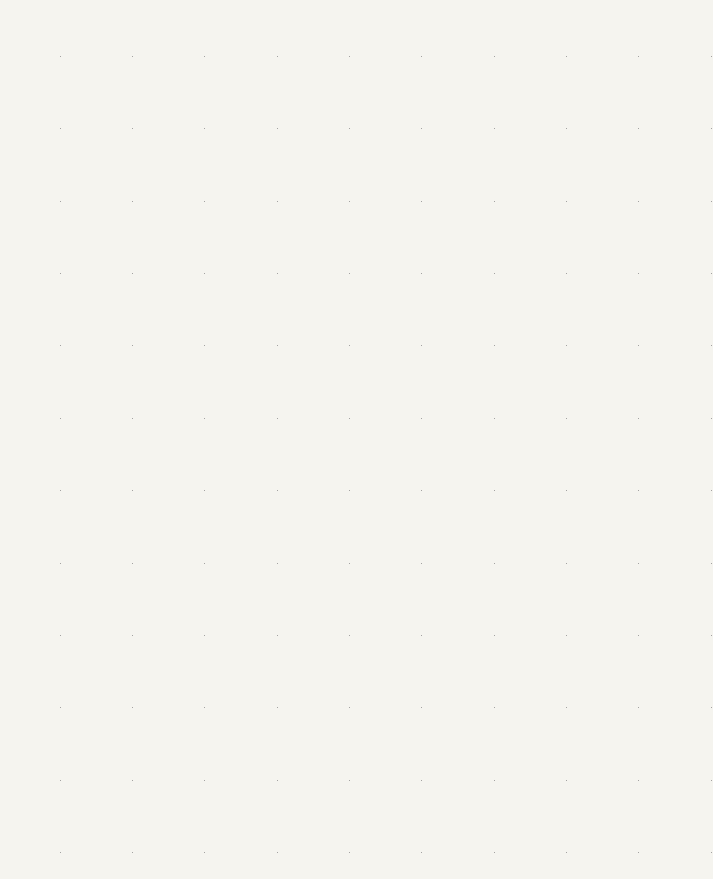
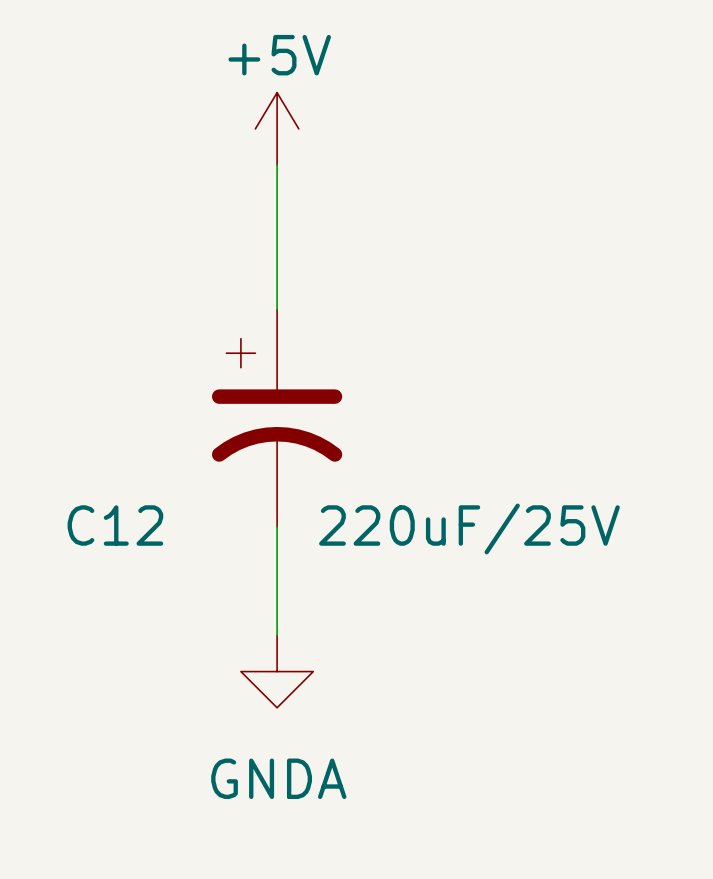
power symbol: none -> +5V (277, 128)
wire: none -> (277, 165) (277, 309)
C12: none -> 220uF/25V (277, 418)
wire: none -> (277, 526) (277, 635)
power symbol: none -> GNDA (277, 671)

